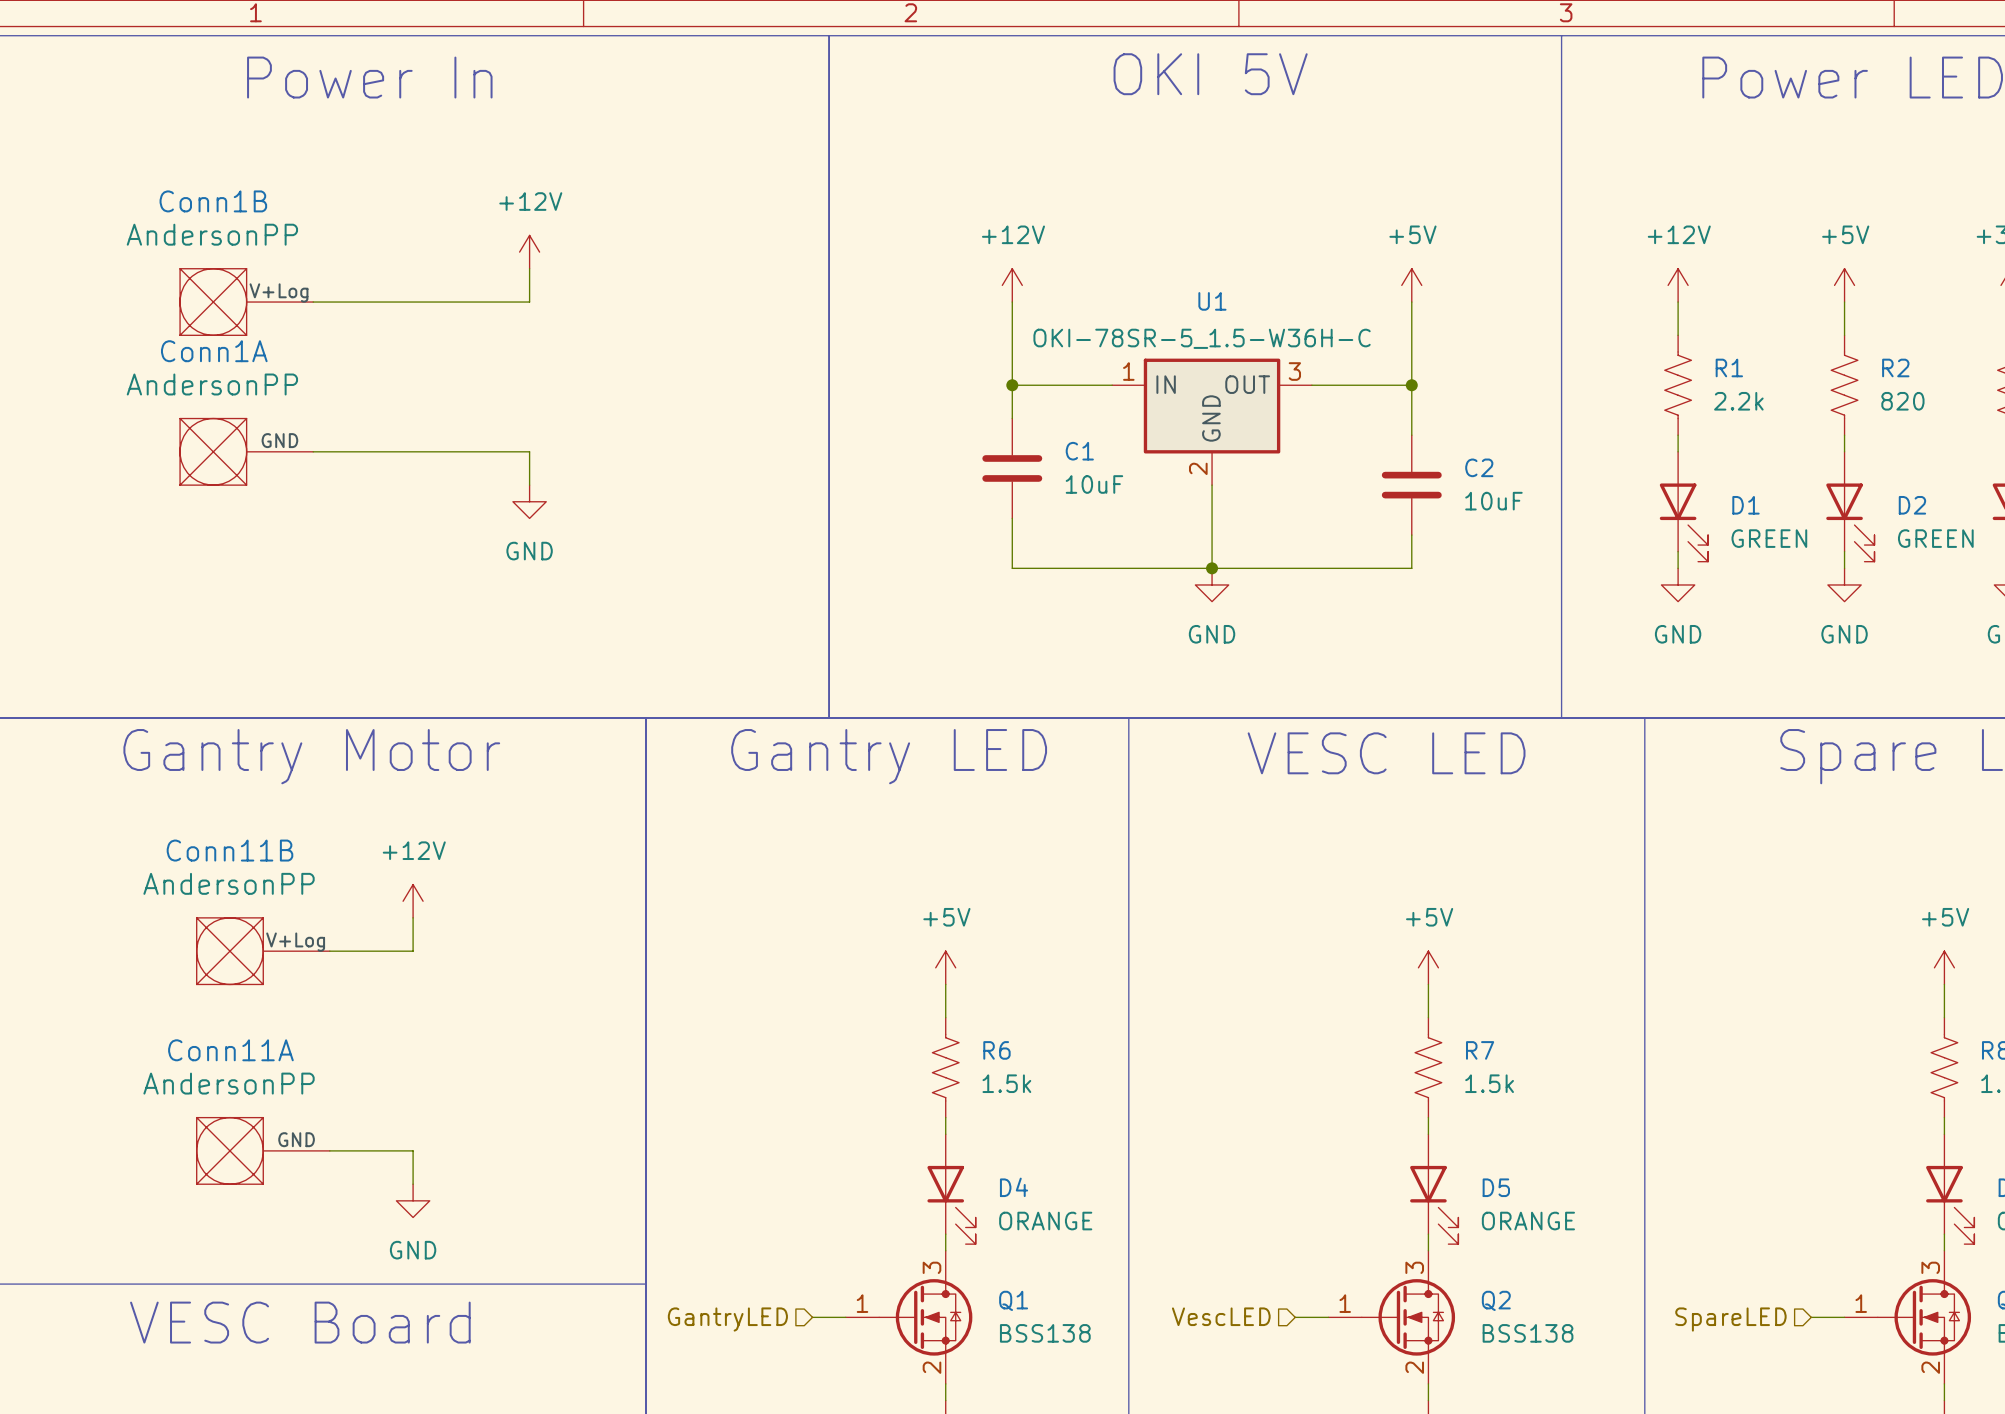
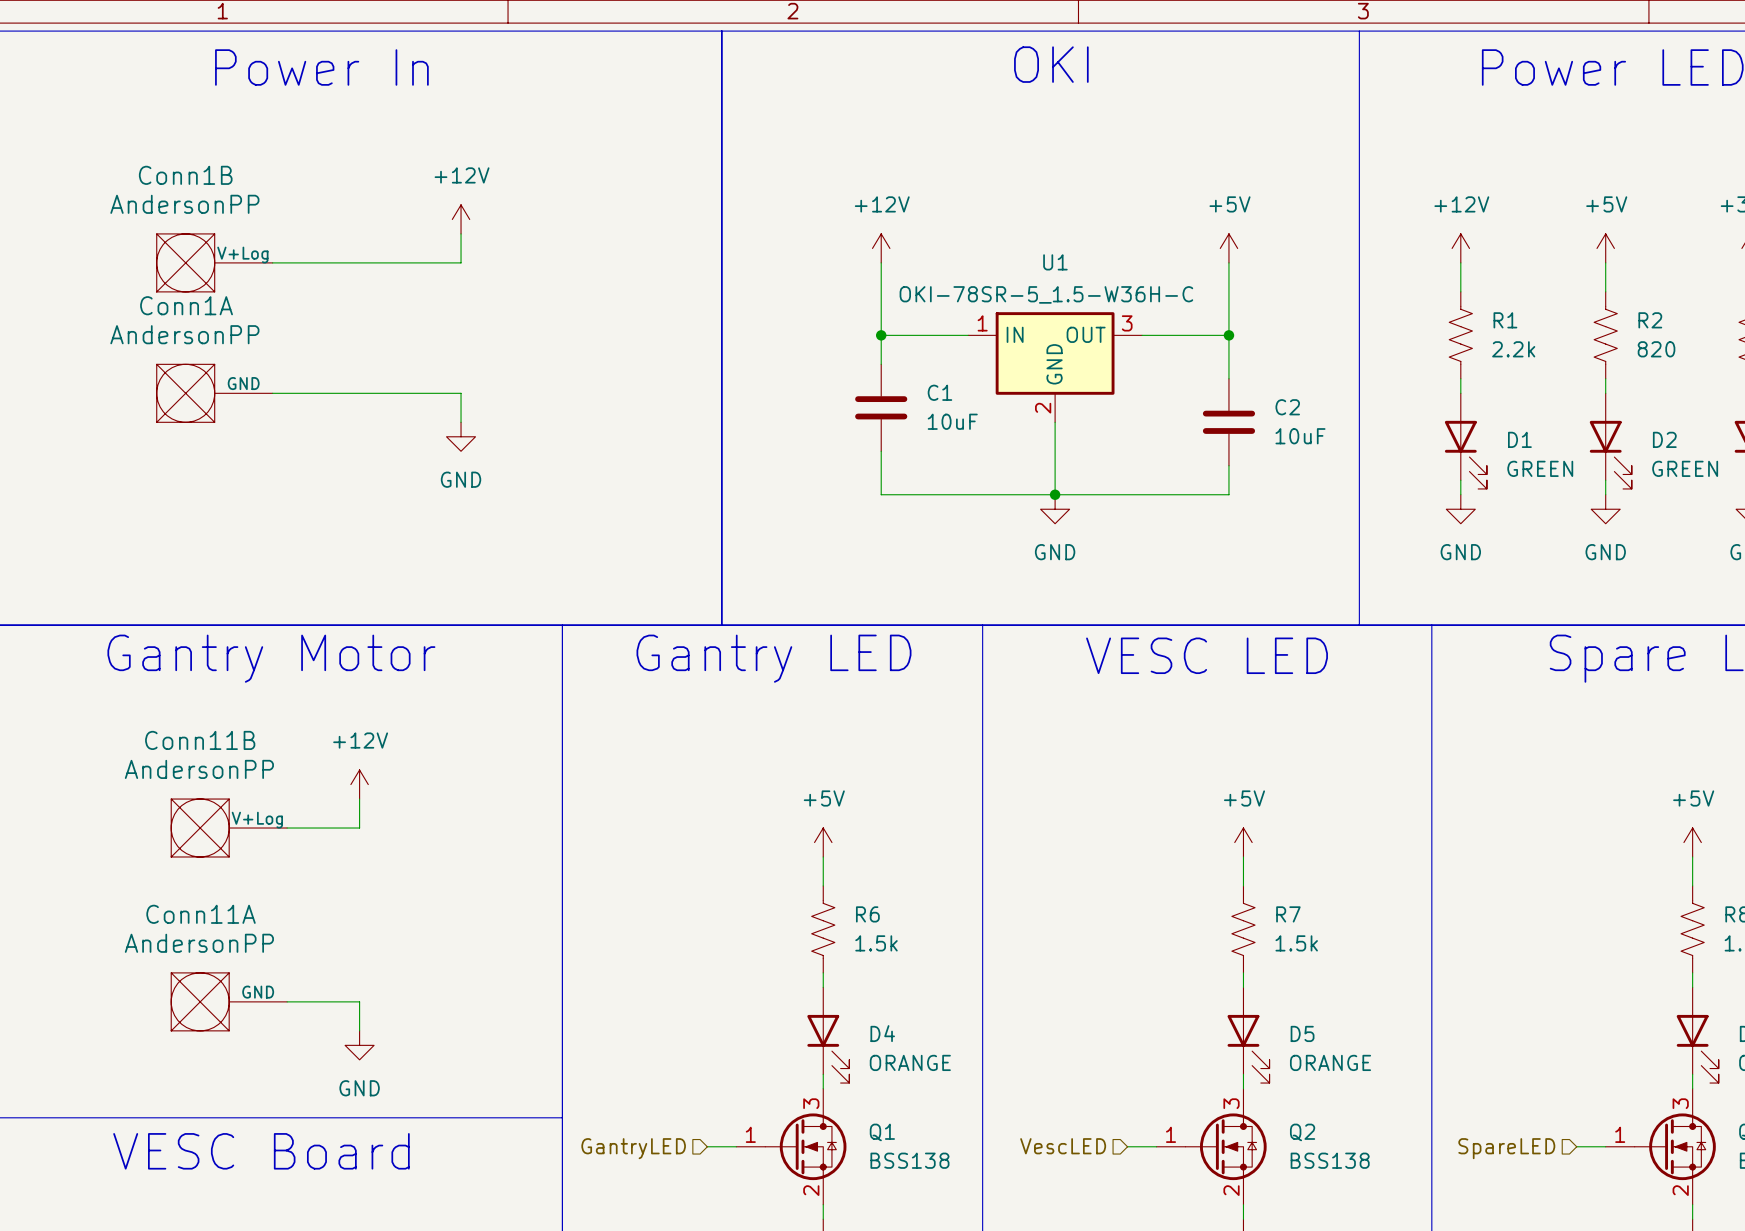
text: OKI 5V (1210, 74) -> OKI (1051, 64)

